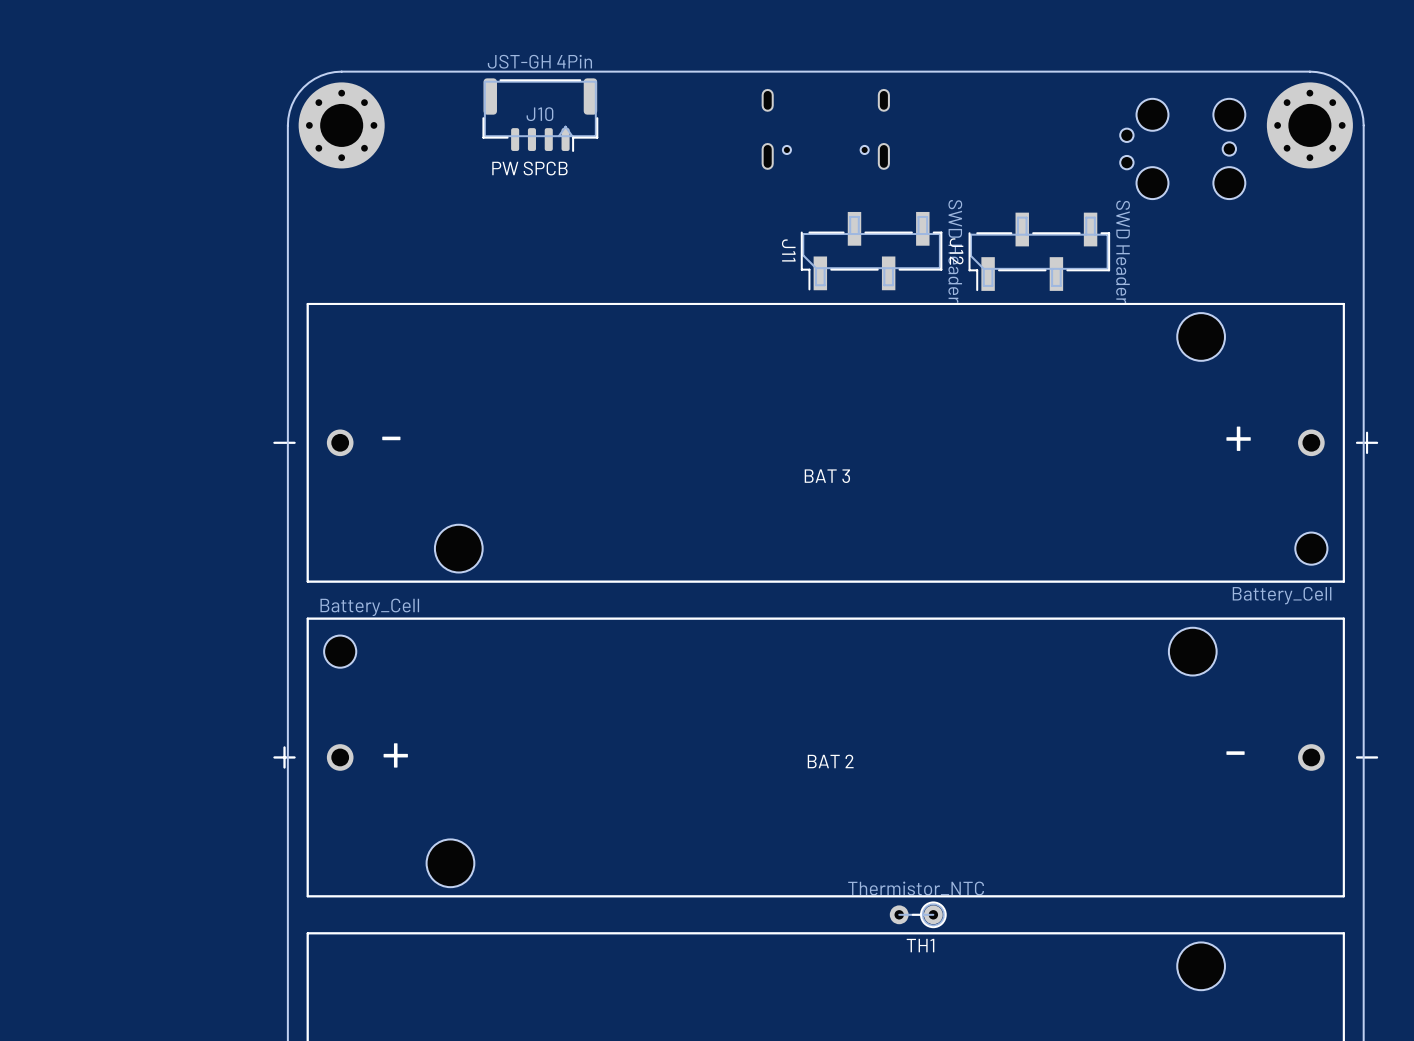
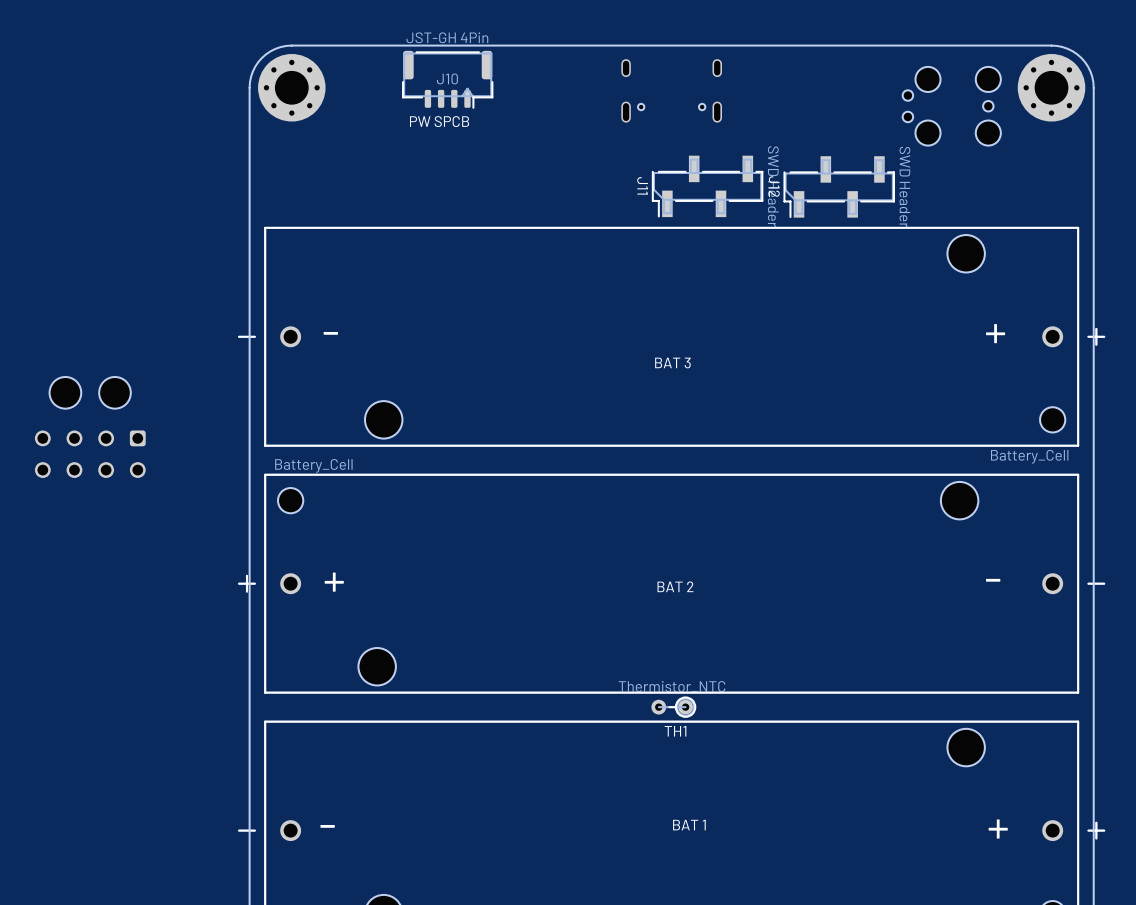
part: none -> (90, 427)
TH1 position: (918, 914) -> (673, 707)

